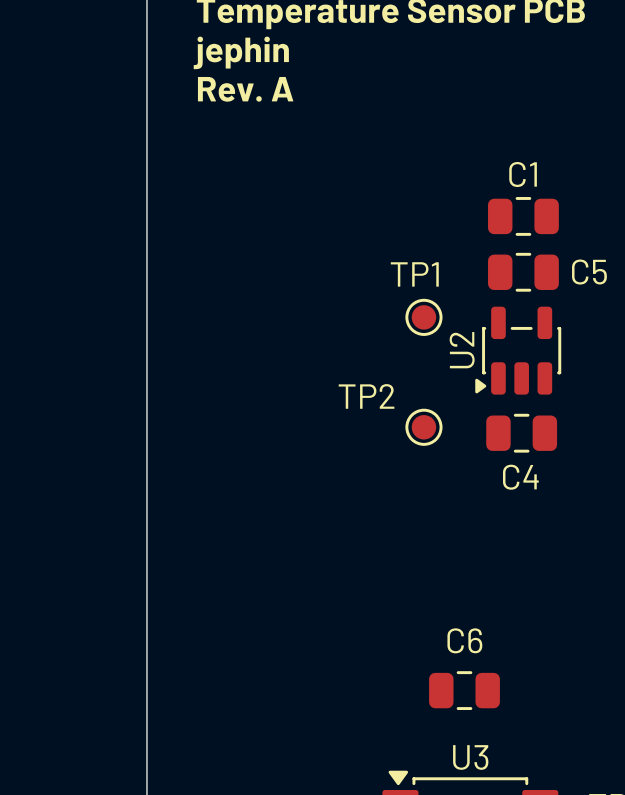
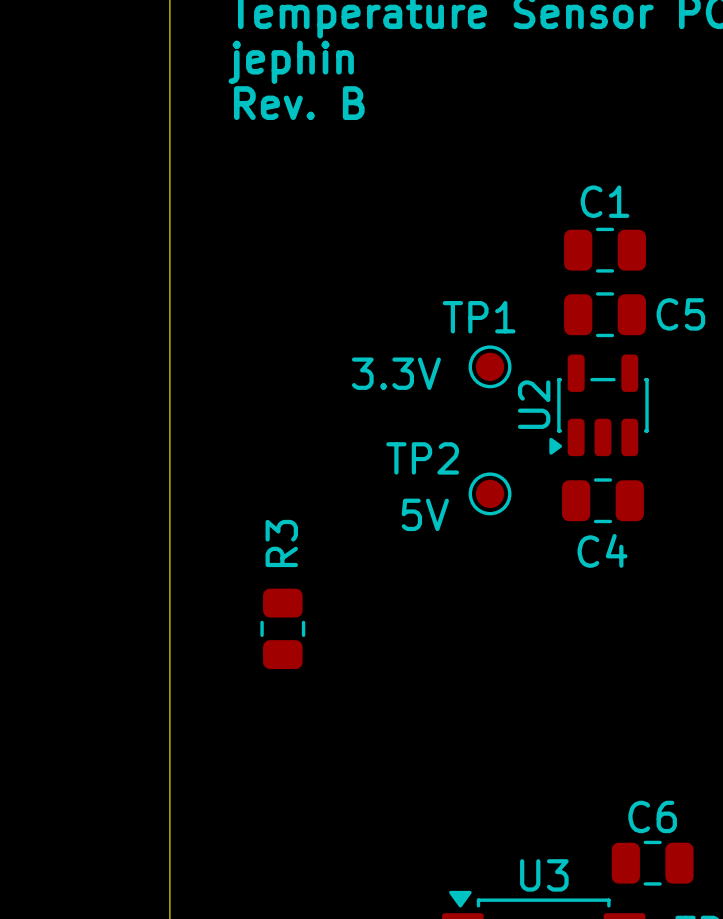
text: Rev. A (245, 89) -> Rev. B (299, 103)
TP1 text: none -> 3.3V (396, 373)
TP2 text: none -> 5V (425, 514)
R3: none -> (282, 628)
C6 name position: C6 (464, 640) -> C6 (652, 816)
C6 position: (464, 690) -> (652, 863)

